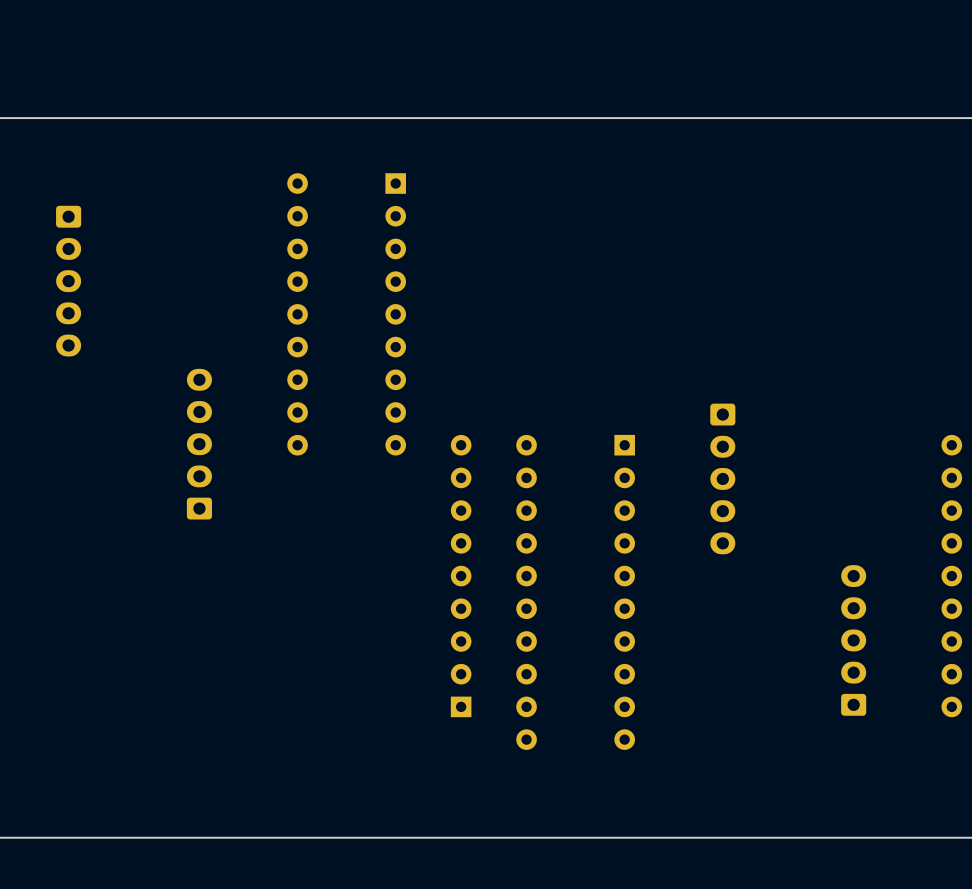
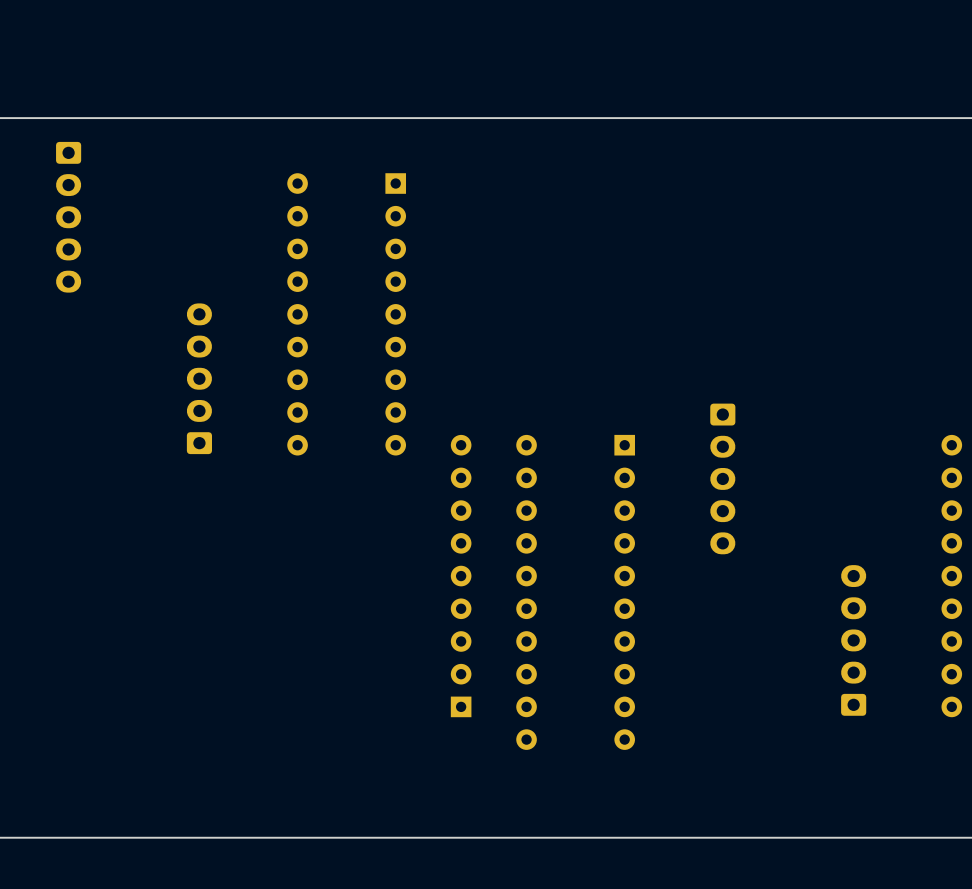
part position: (68, 281) -> (68, 217)
part position: (199, 444) -> (199, 378)

